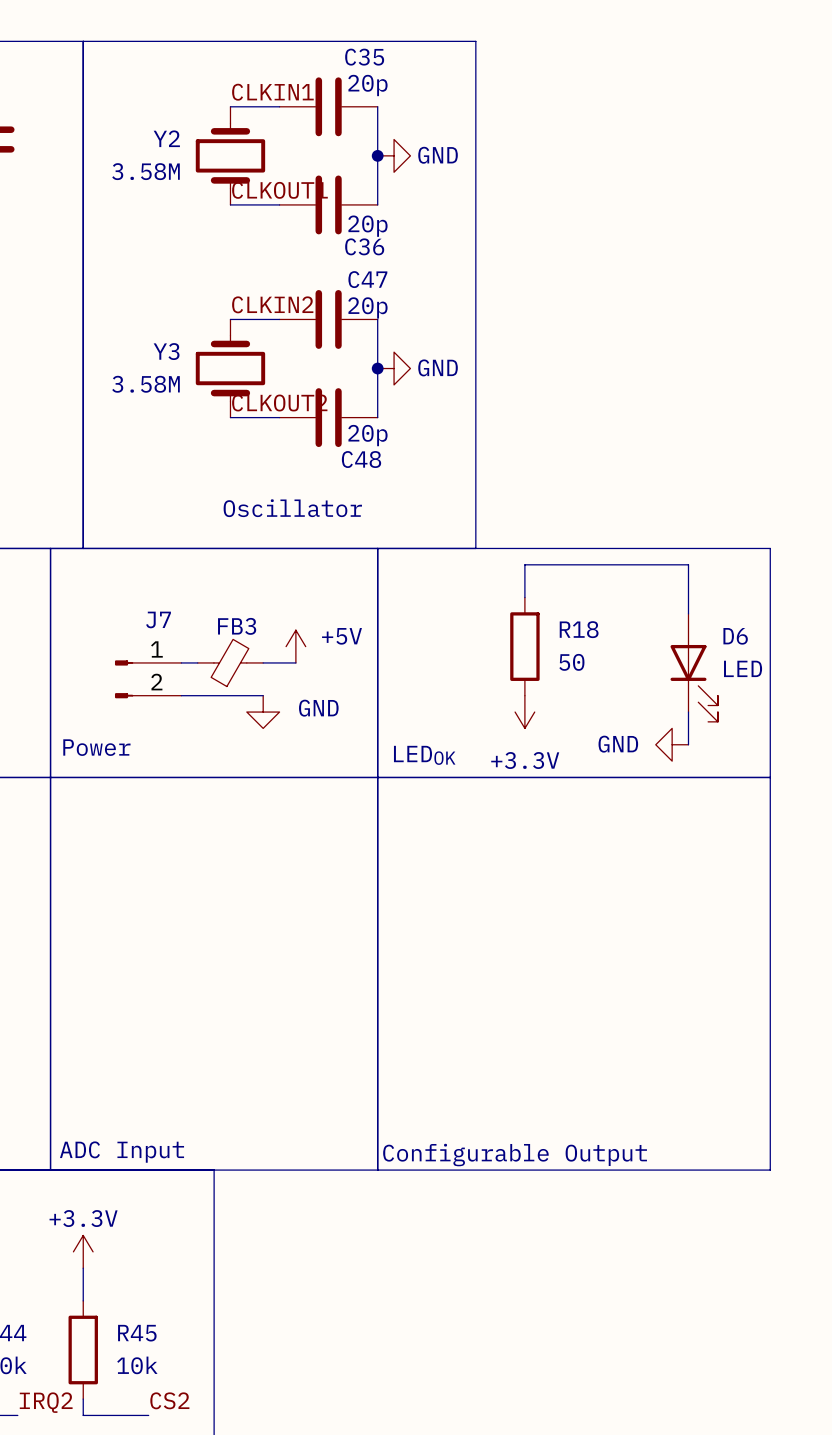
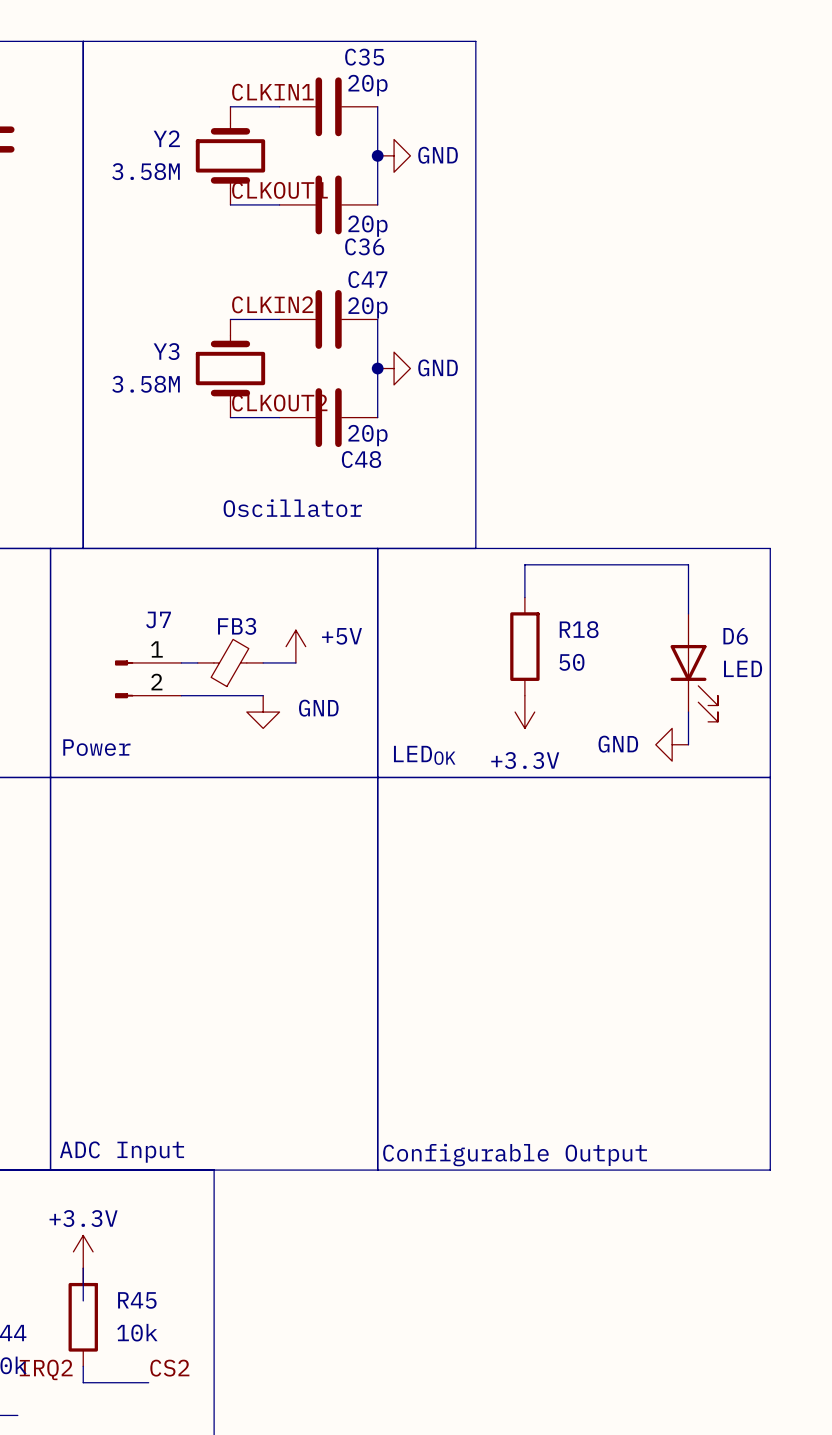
R45 position: (83, 1350) -> (83, 1317)
wire: (83, 1399) (83, 1415) (148, 1415) -> (83, 1366) (83, 1382) (148, 1382)
label position: CS2 (169, 1400) -> CS2 (169, 1368)
label position: IRQ2 (46, 1402) -> IRQ2 (46, 1369)

